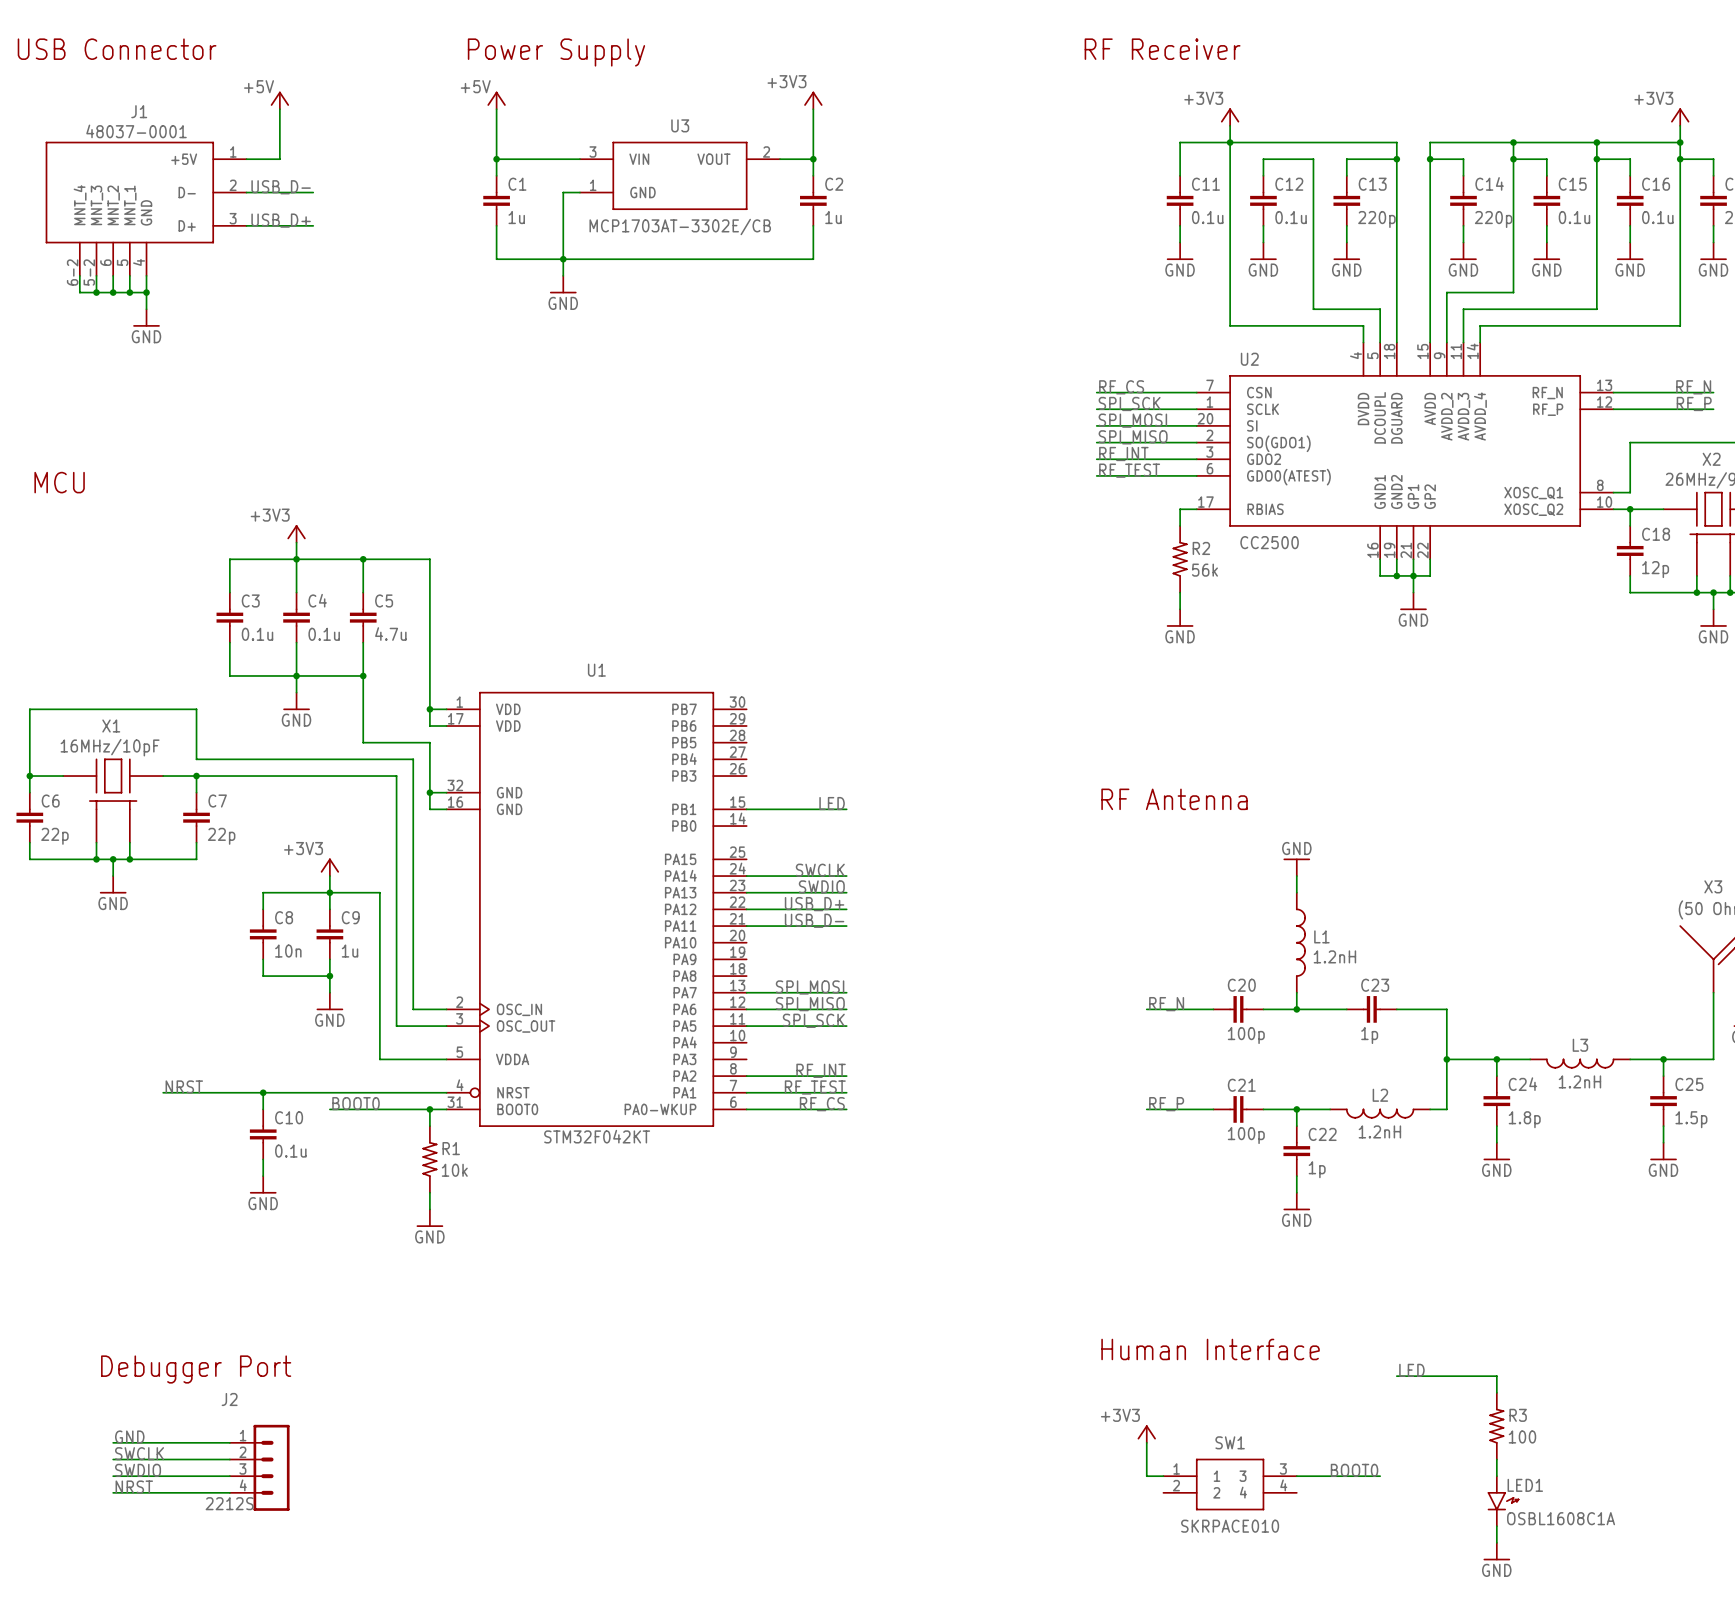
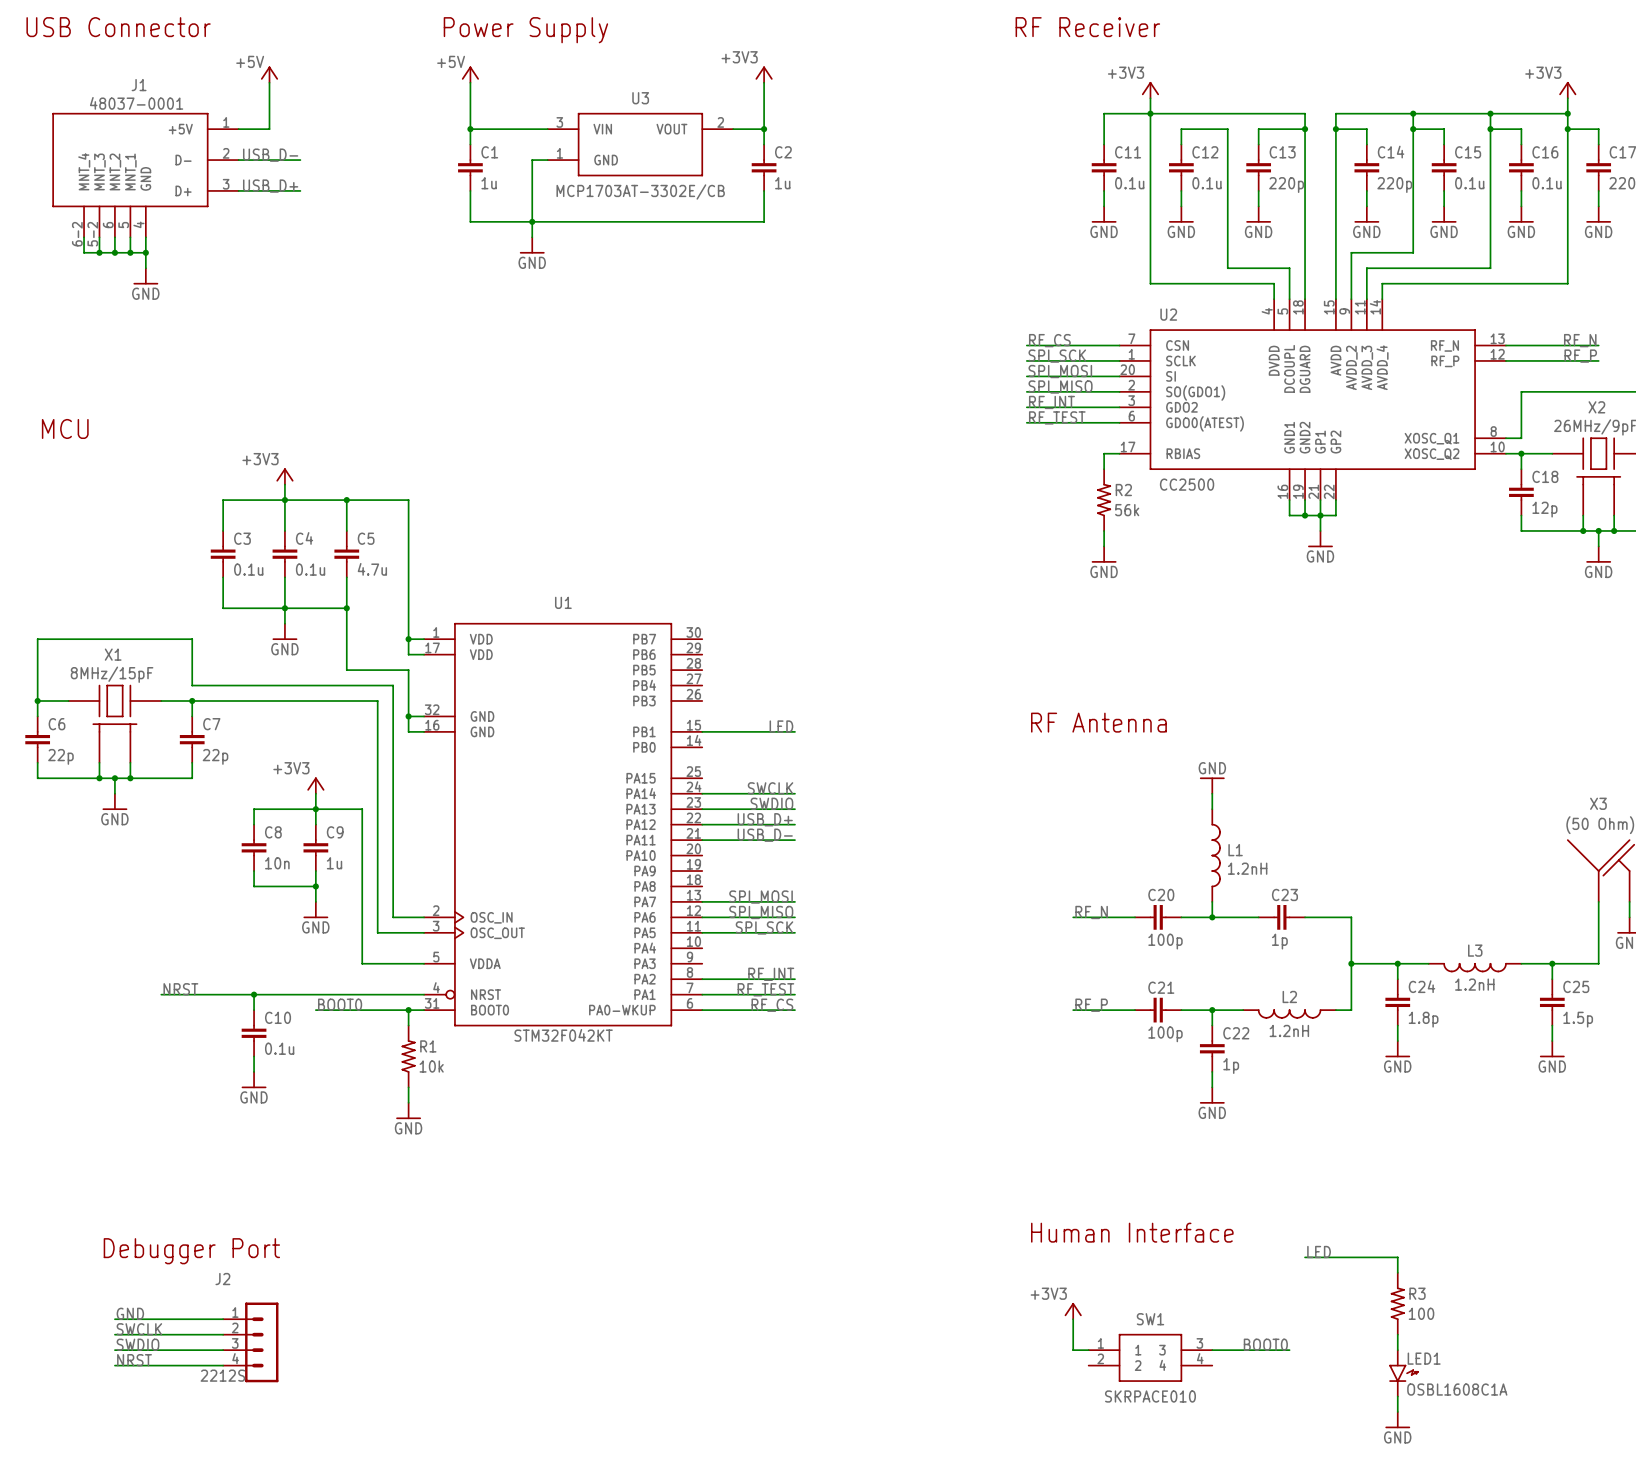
X1 value: 16MHz/10pF (110, 747) -> 8MHz/15pF (112, 674)

